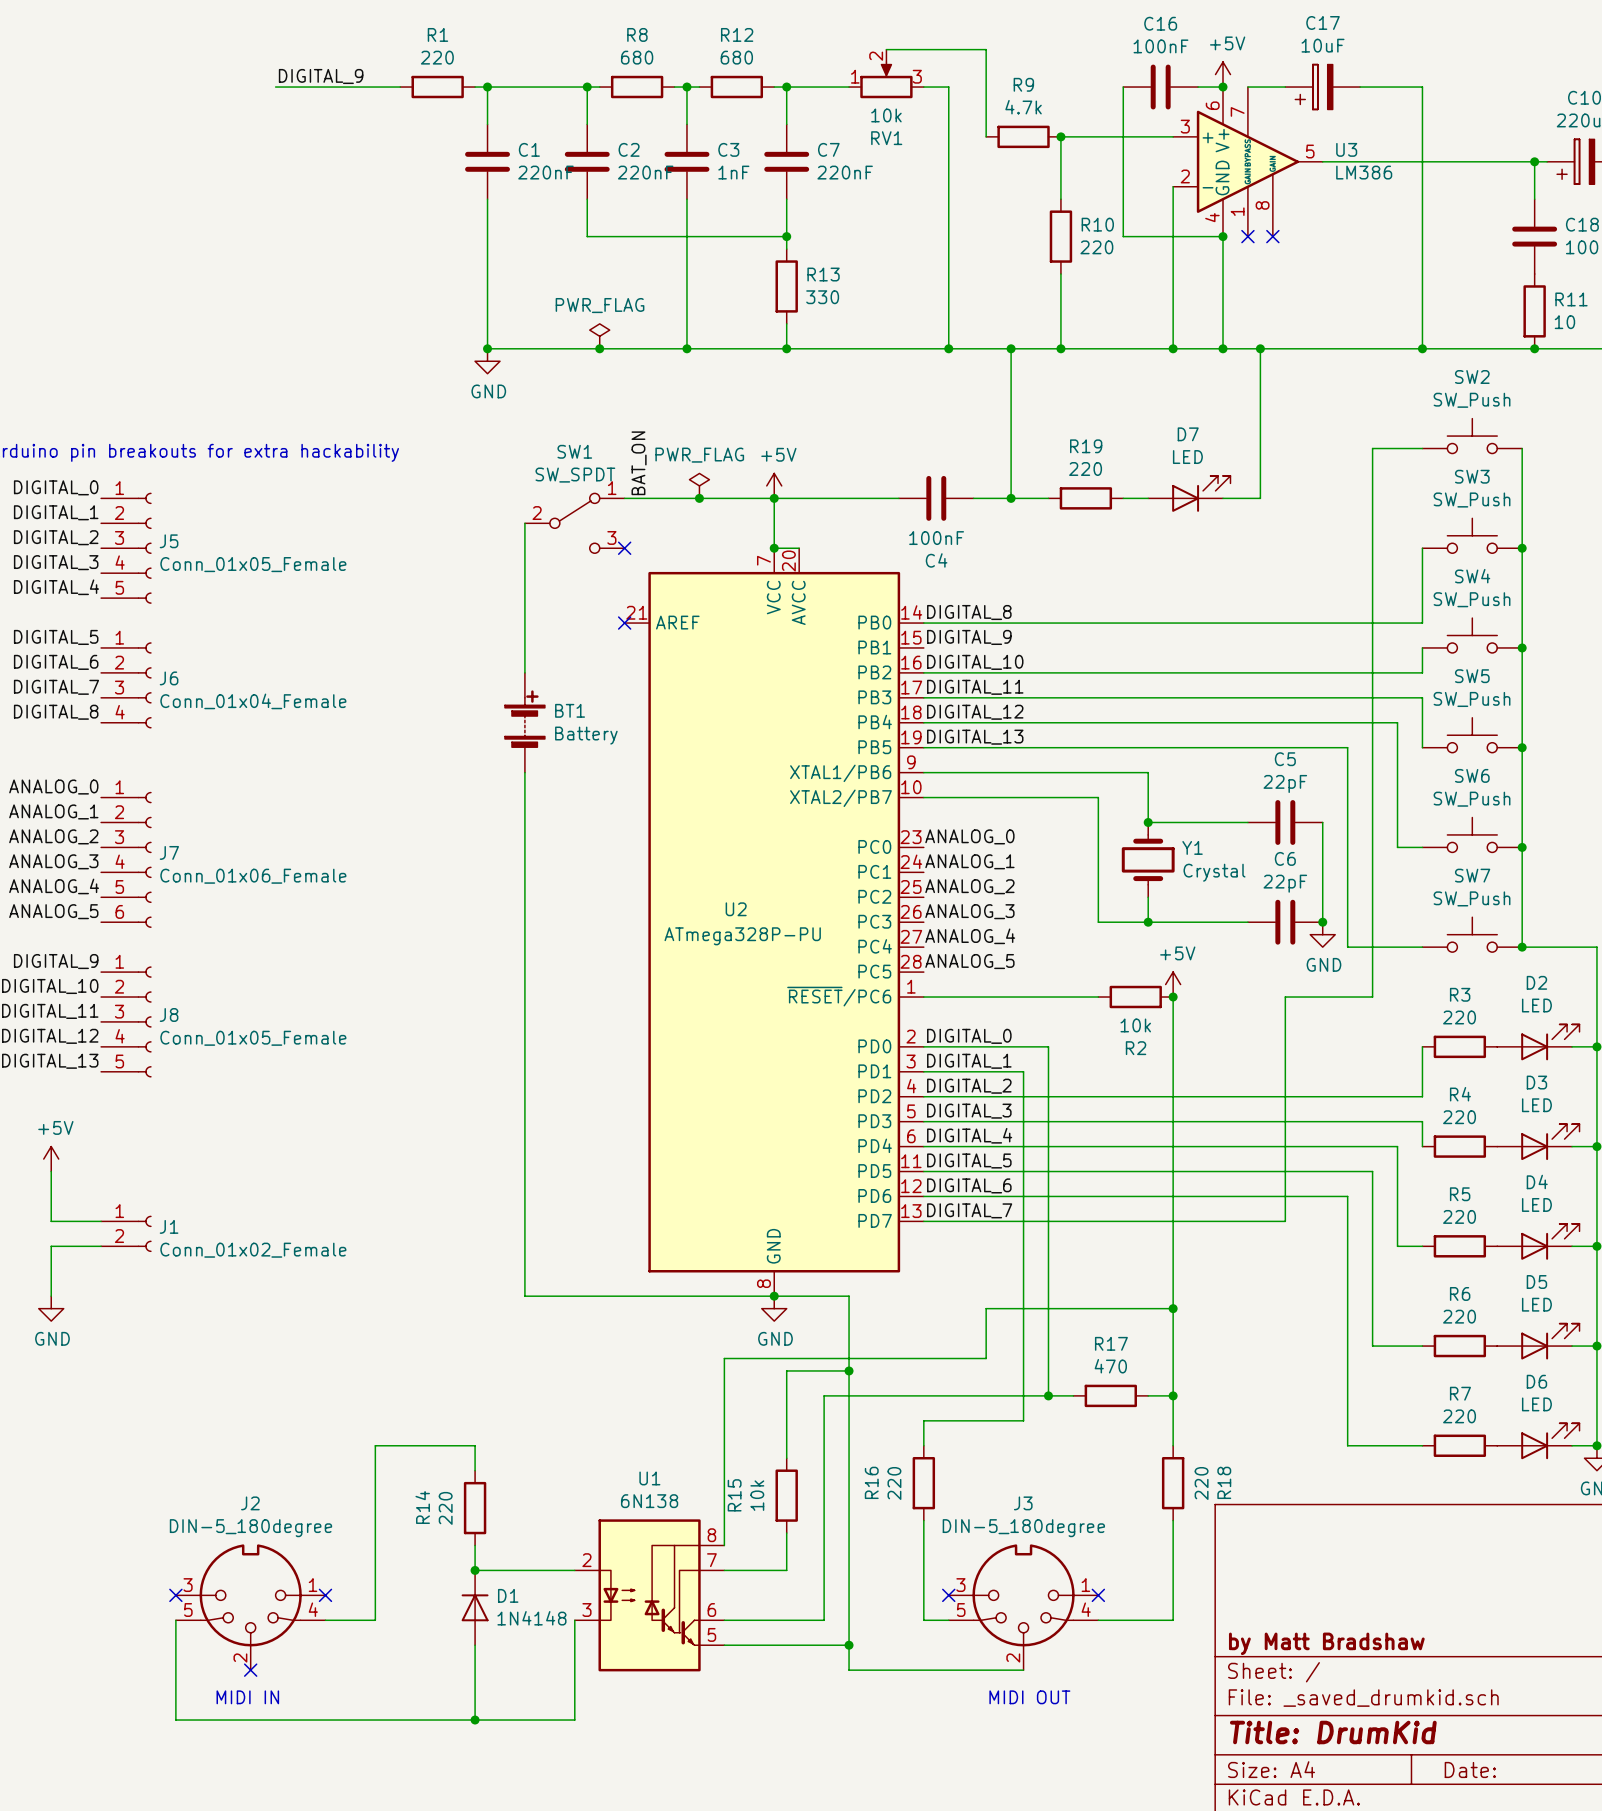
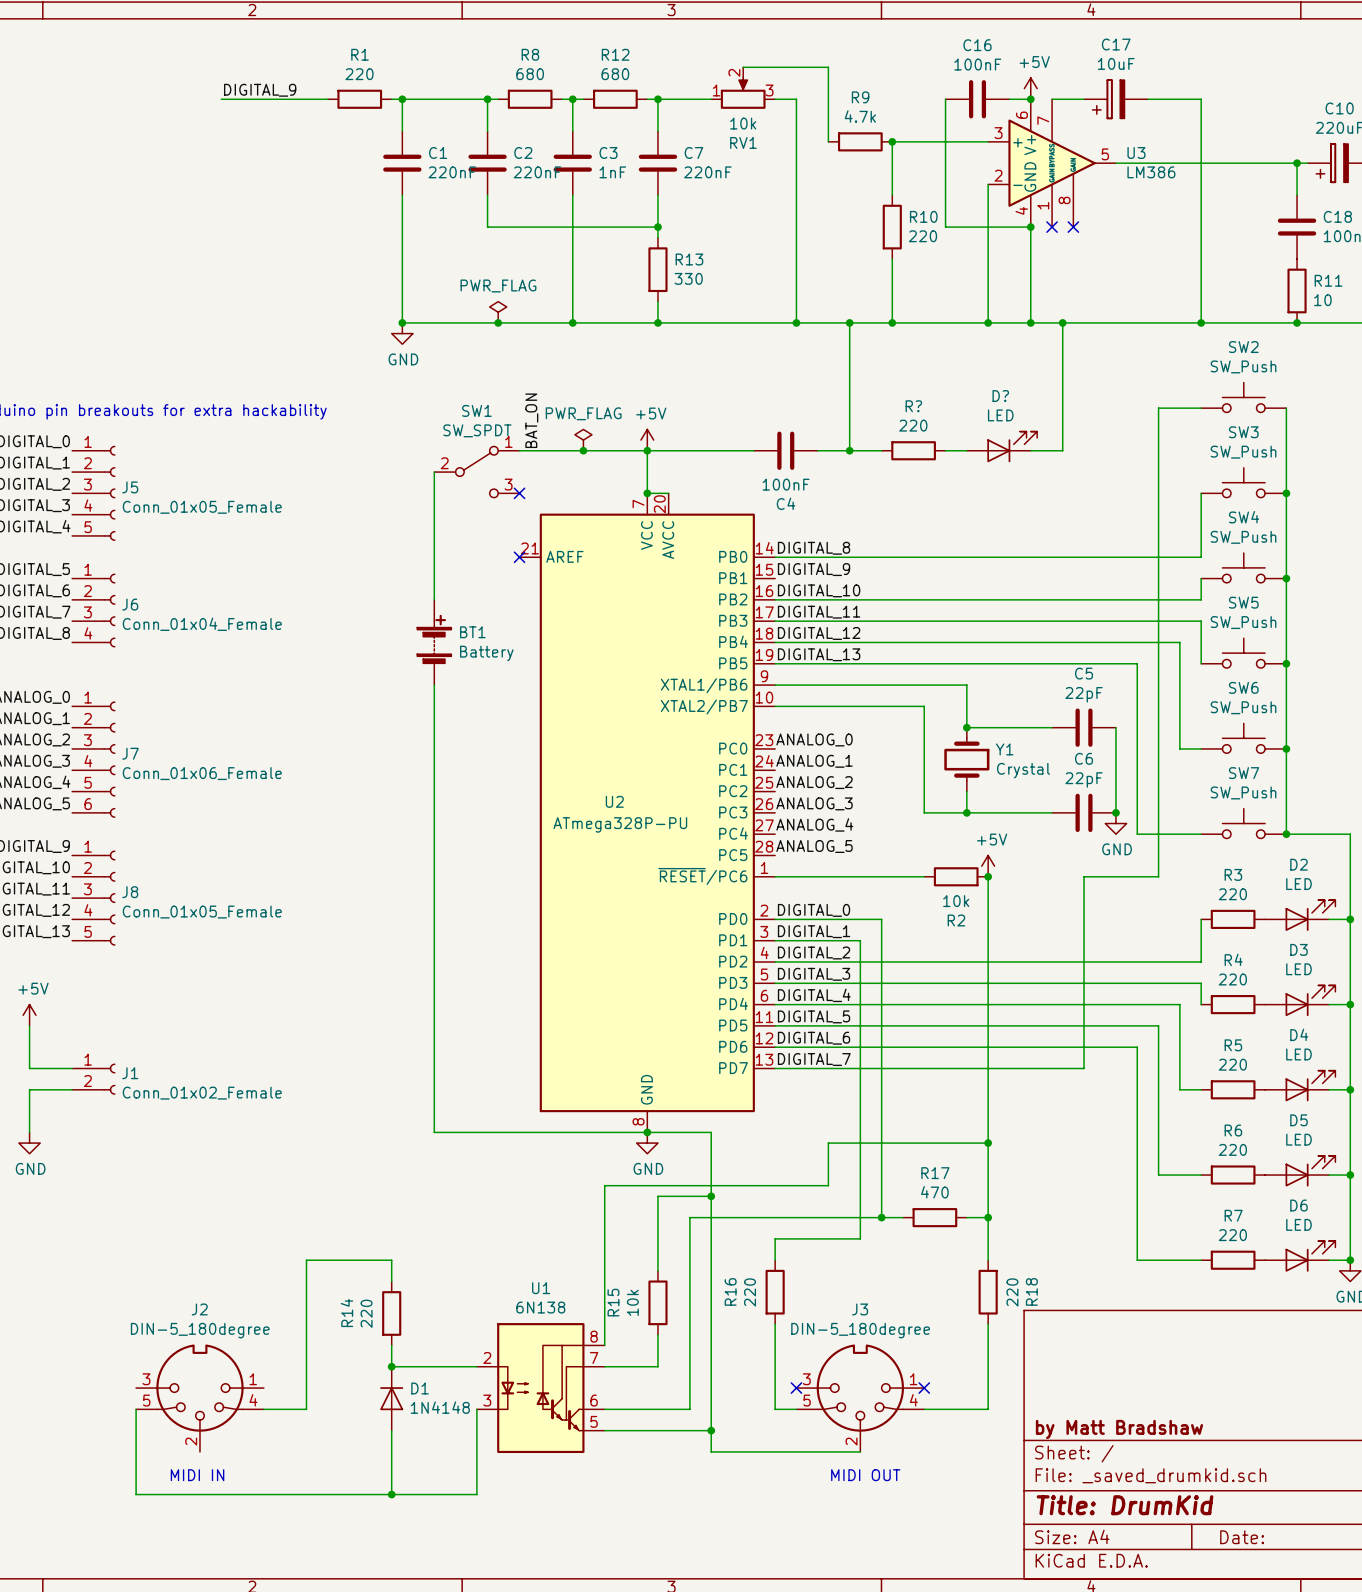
D7 name: D7 (1188, 434) -> D? (1000, 396)
R19 name: R19 (1086, 446) -> R? (913, 406)
no-connect mark: (175, 1595) -> none
no-connect mark: (325, 1595) -> none
no-connect mark: (250, 1670) -> none

